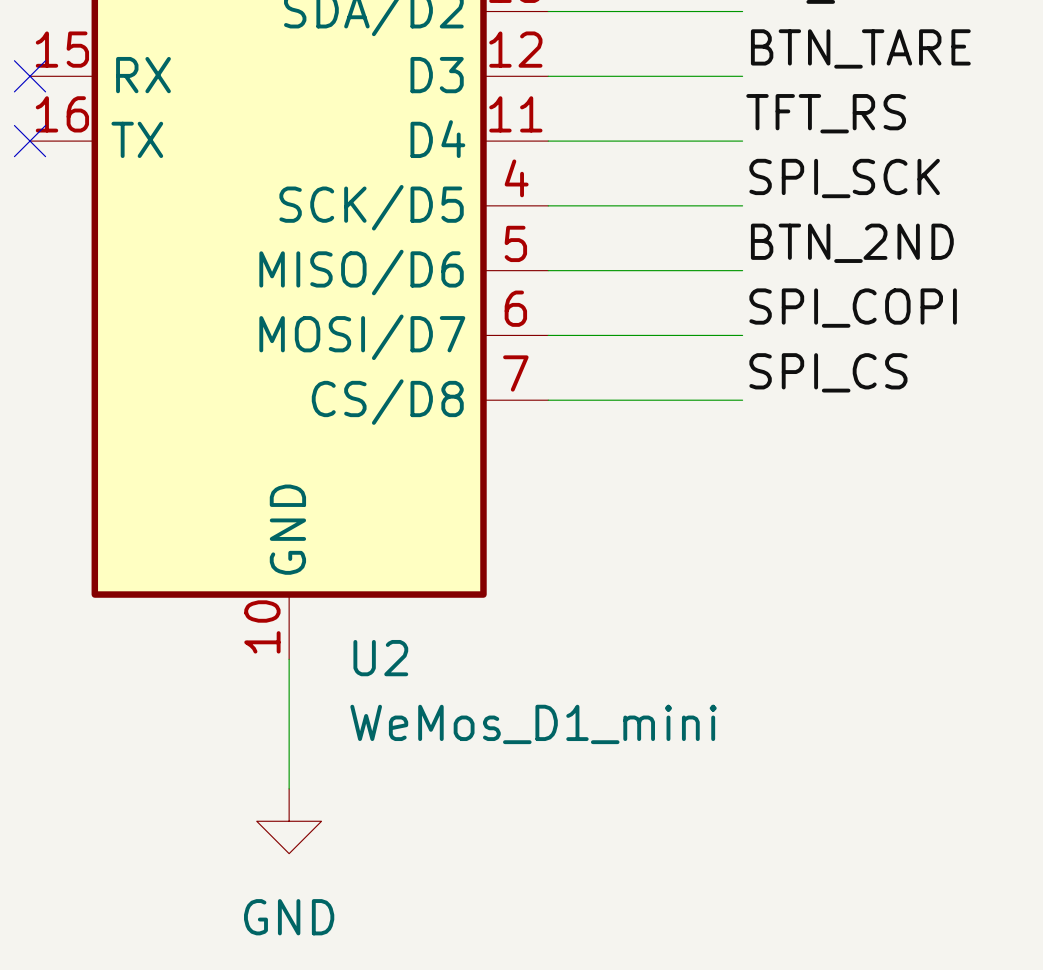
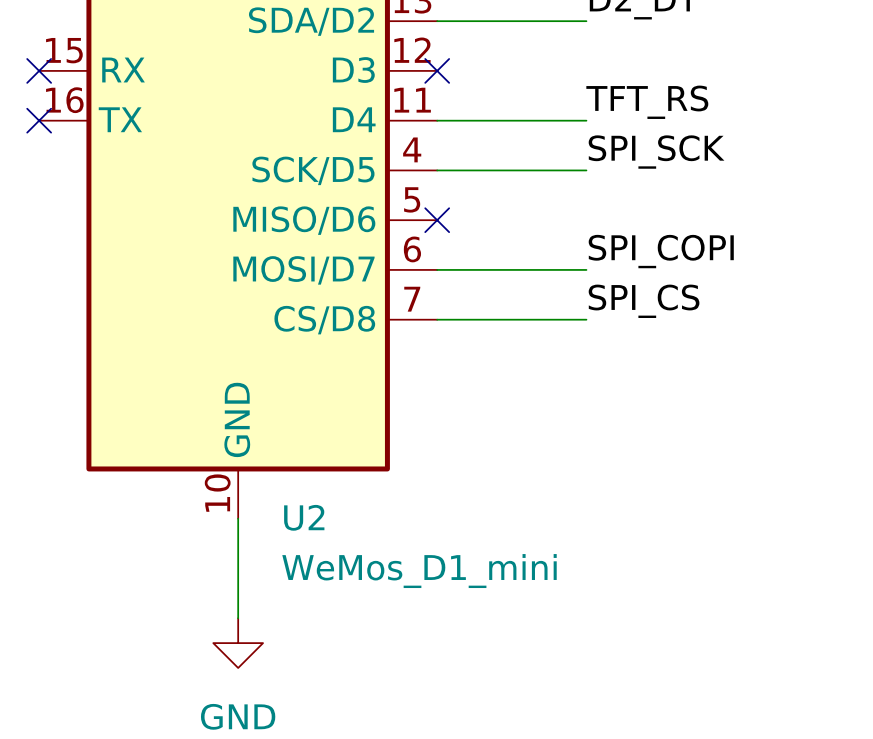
label: BTN_TARE (860, 48) -> none
wire: (548, 76) (742, 76) -> none
no-connect mark: none -> (437, 70)
label: BTN_2ND (852, 243) -> none
wire: (548, 270) (742, 270) -> none
no-connect mark: none -> (437, 220)

